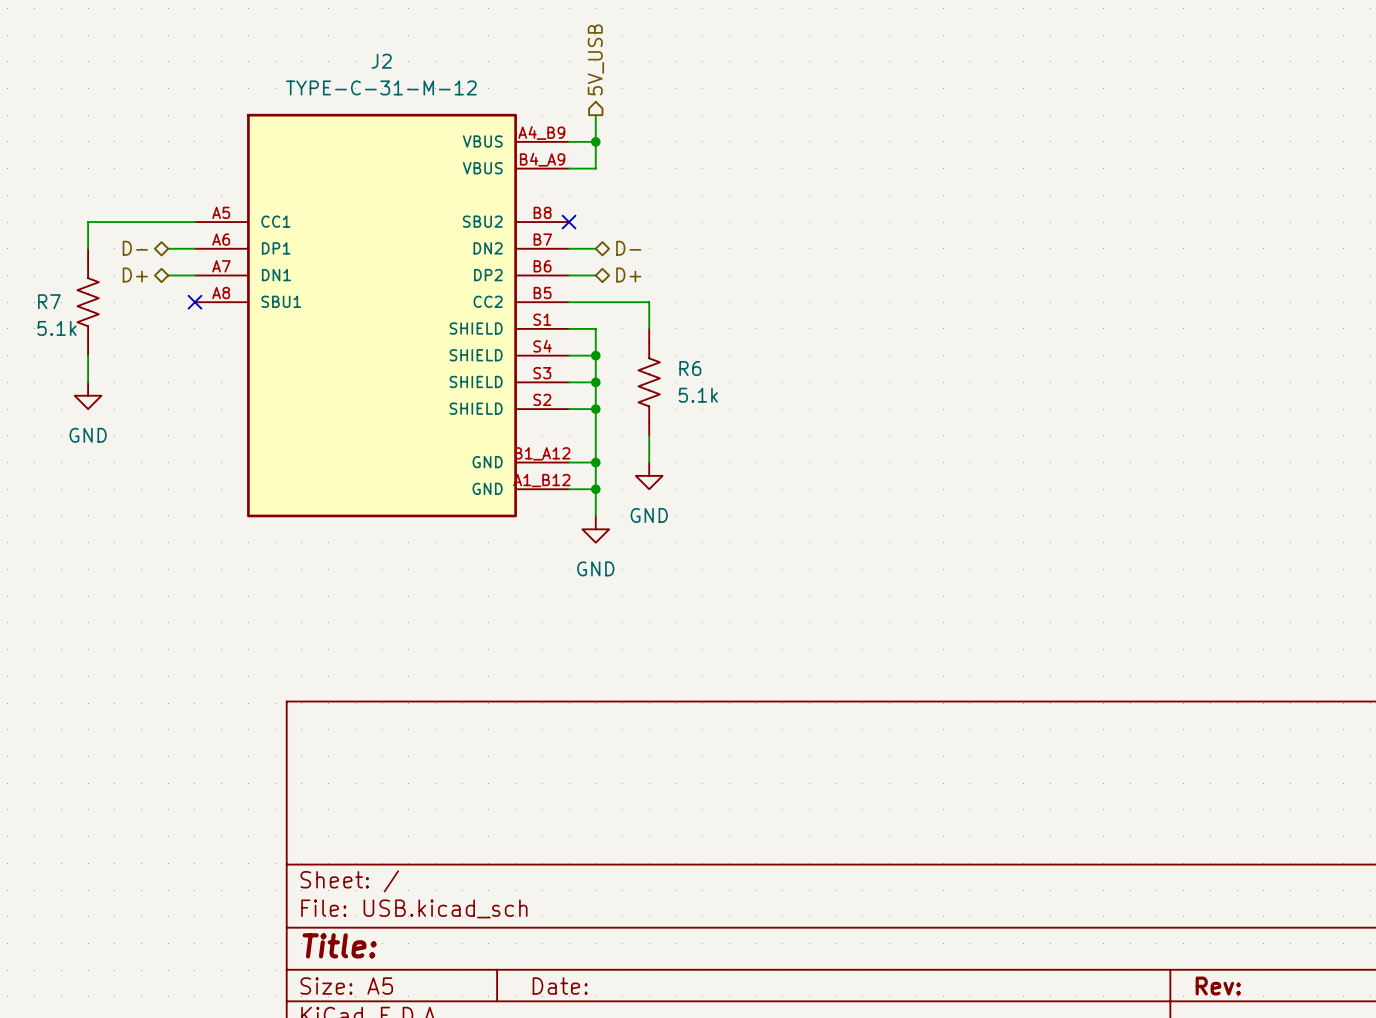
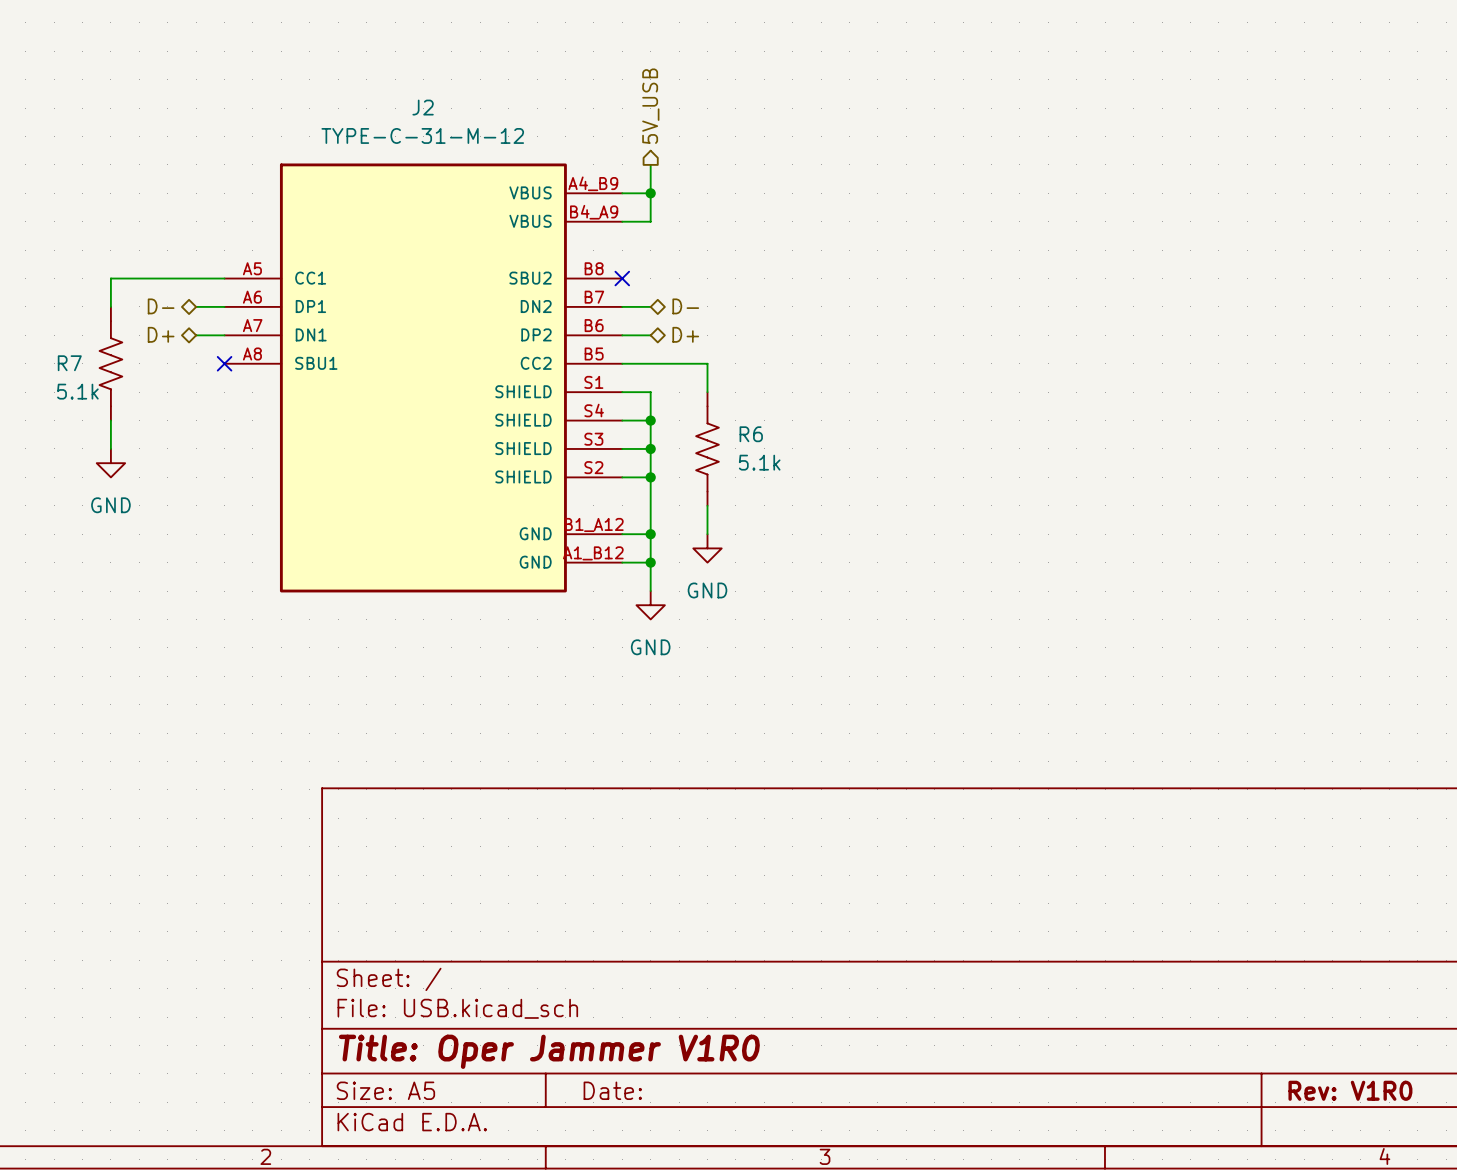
title block: Title: (339, 945) -> Title: Oper Jammer V1R0 (549, 1051)
title block: Rev: (1218, 986) -> Rev: V1R0 (1350, 1090)

